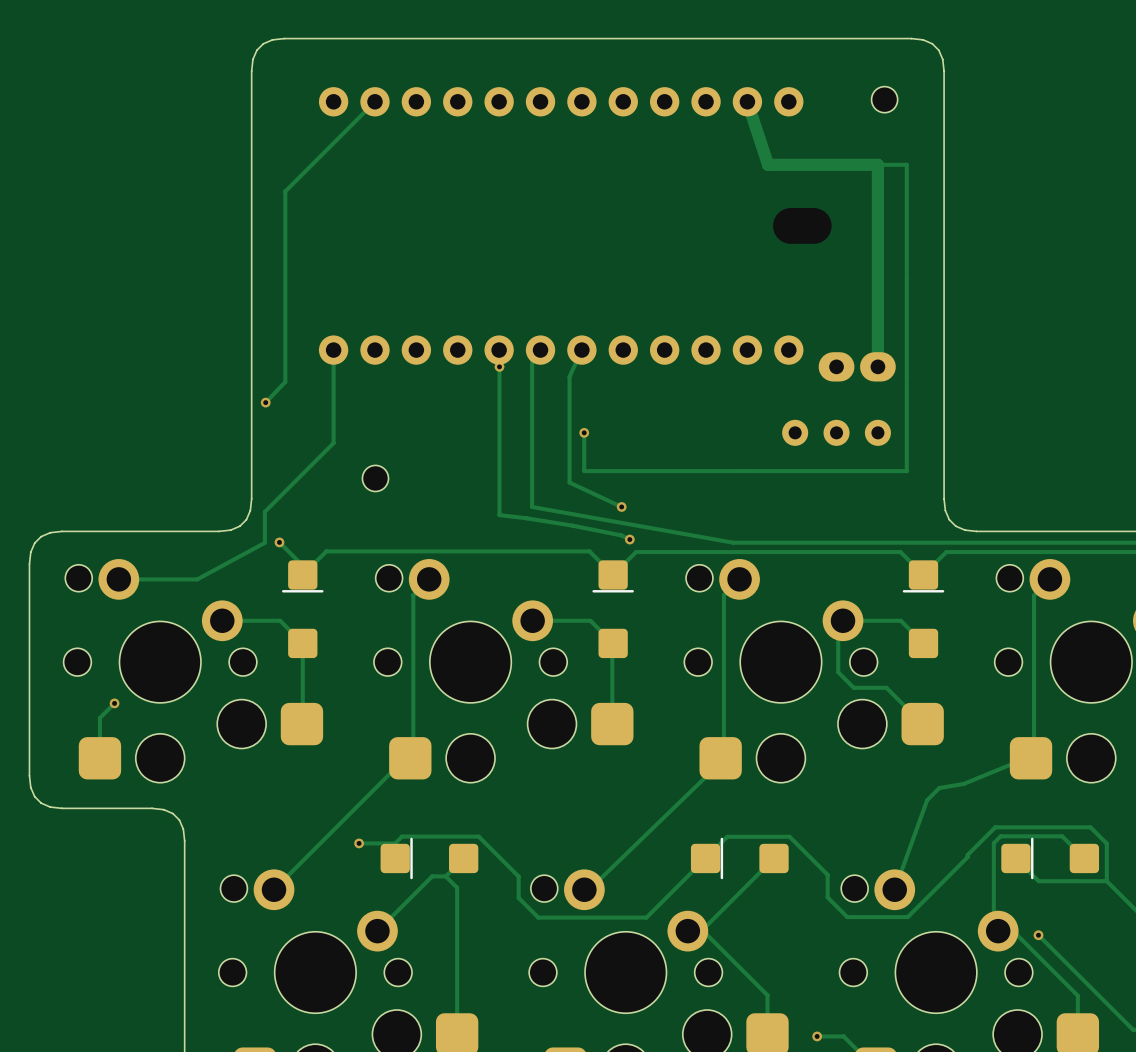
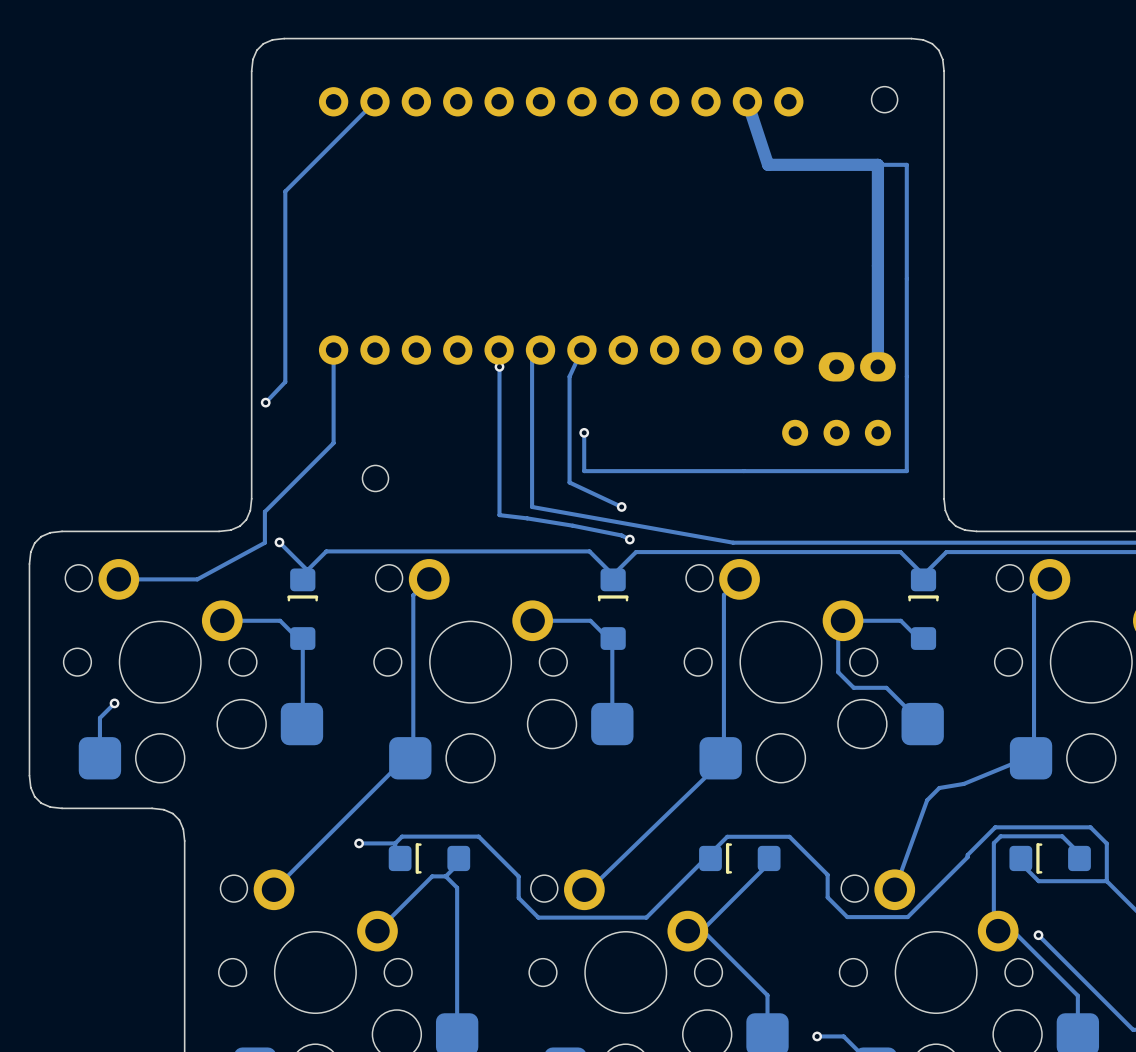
part footprint: [282, 560, 324, 659] -> [287, 568, 319, 650]
part footprint: [592, 560, 634, 659] -> [597, 568, 629, 650]
part footprint: [902, 560, 945, 659] -> [908, 568, 939, 650]
part footprint: [380, 837, 479, 880] -> [388, 842, 471, 874]
part footprint: [690, 837, 789, 880] -> [699, 842, 781, 874]
part footprint: [1001, 837, 1100, 880] -> [1009, 842, 1091, 874]

